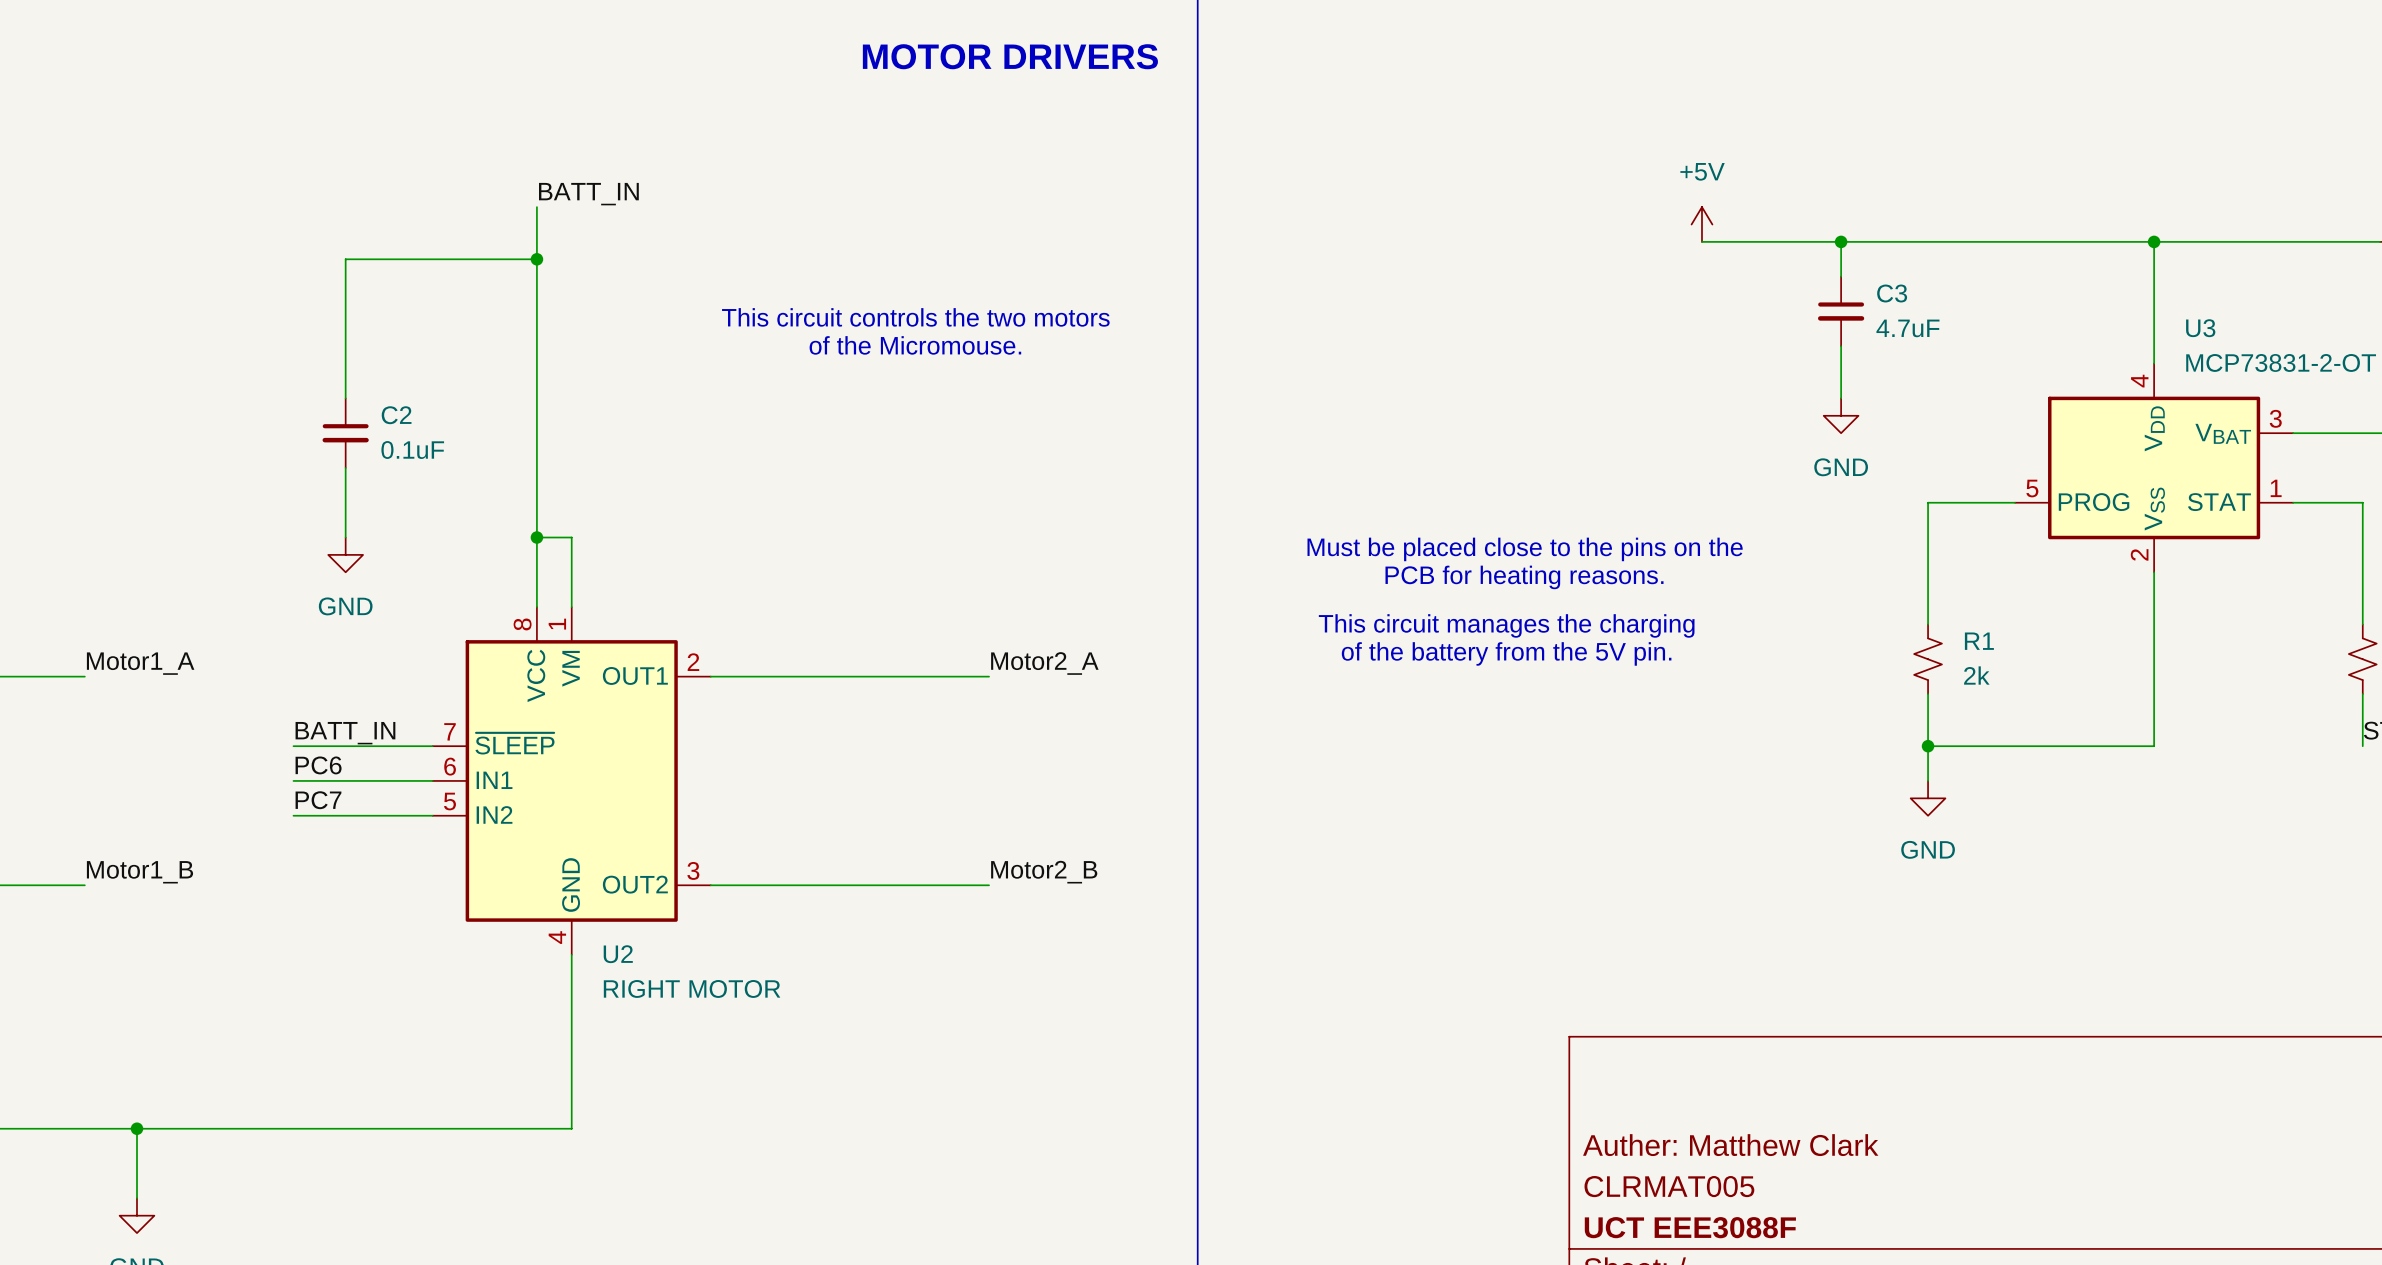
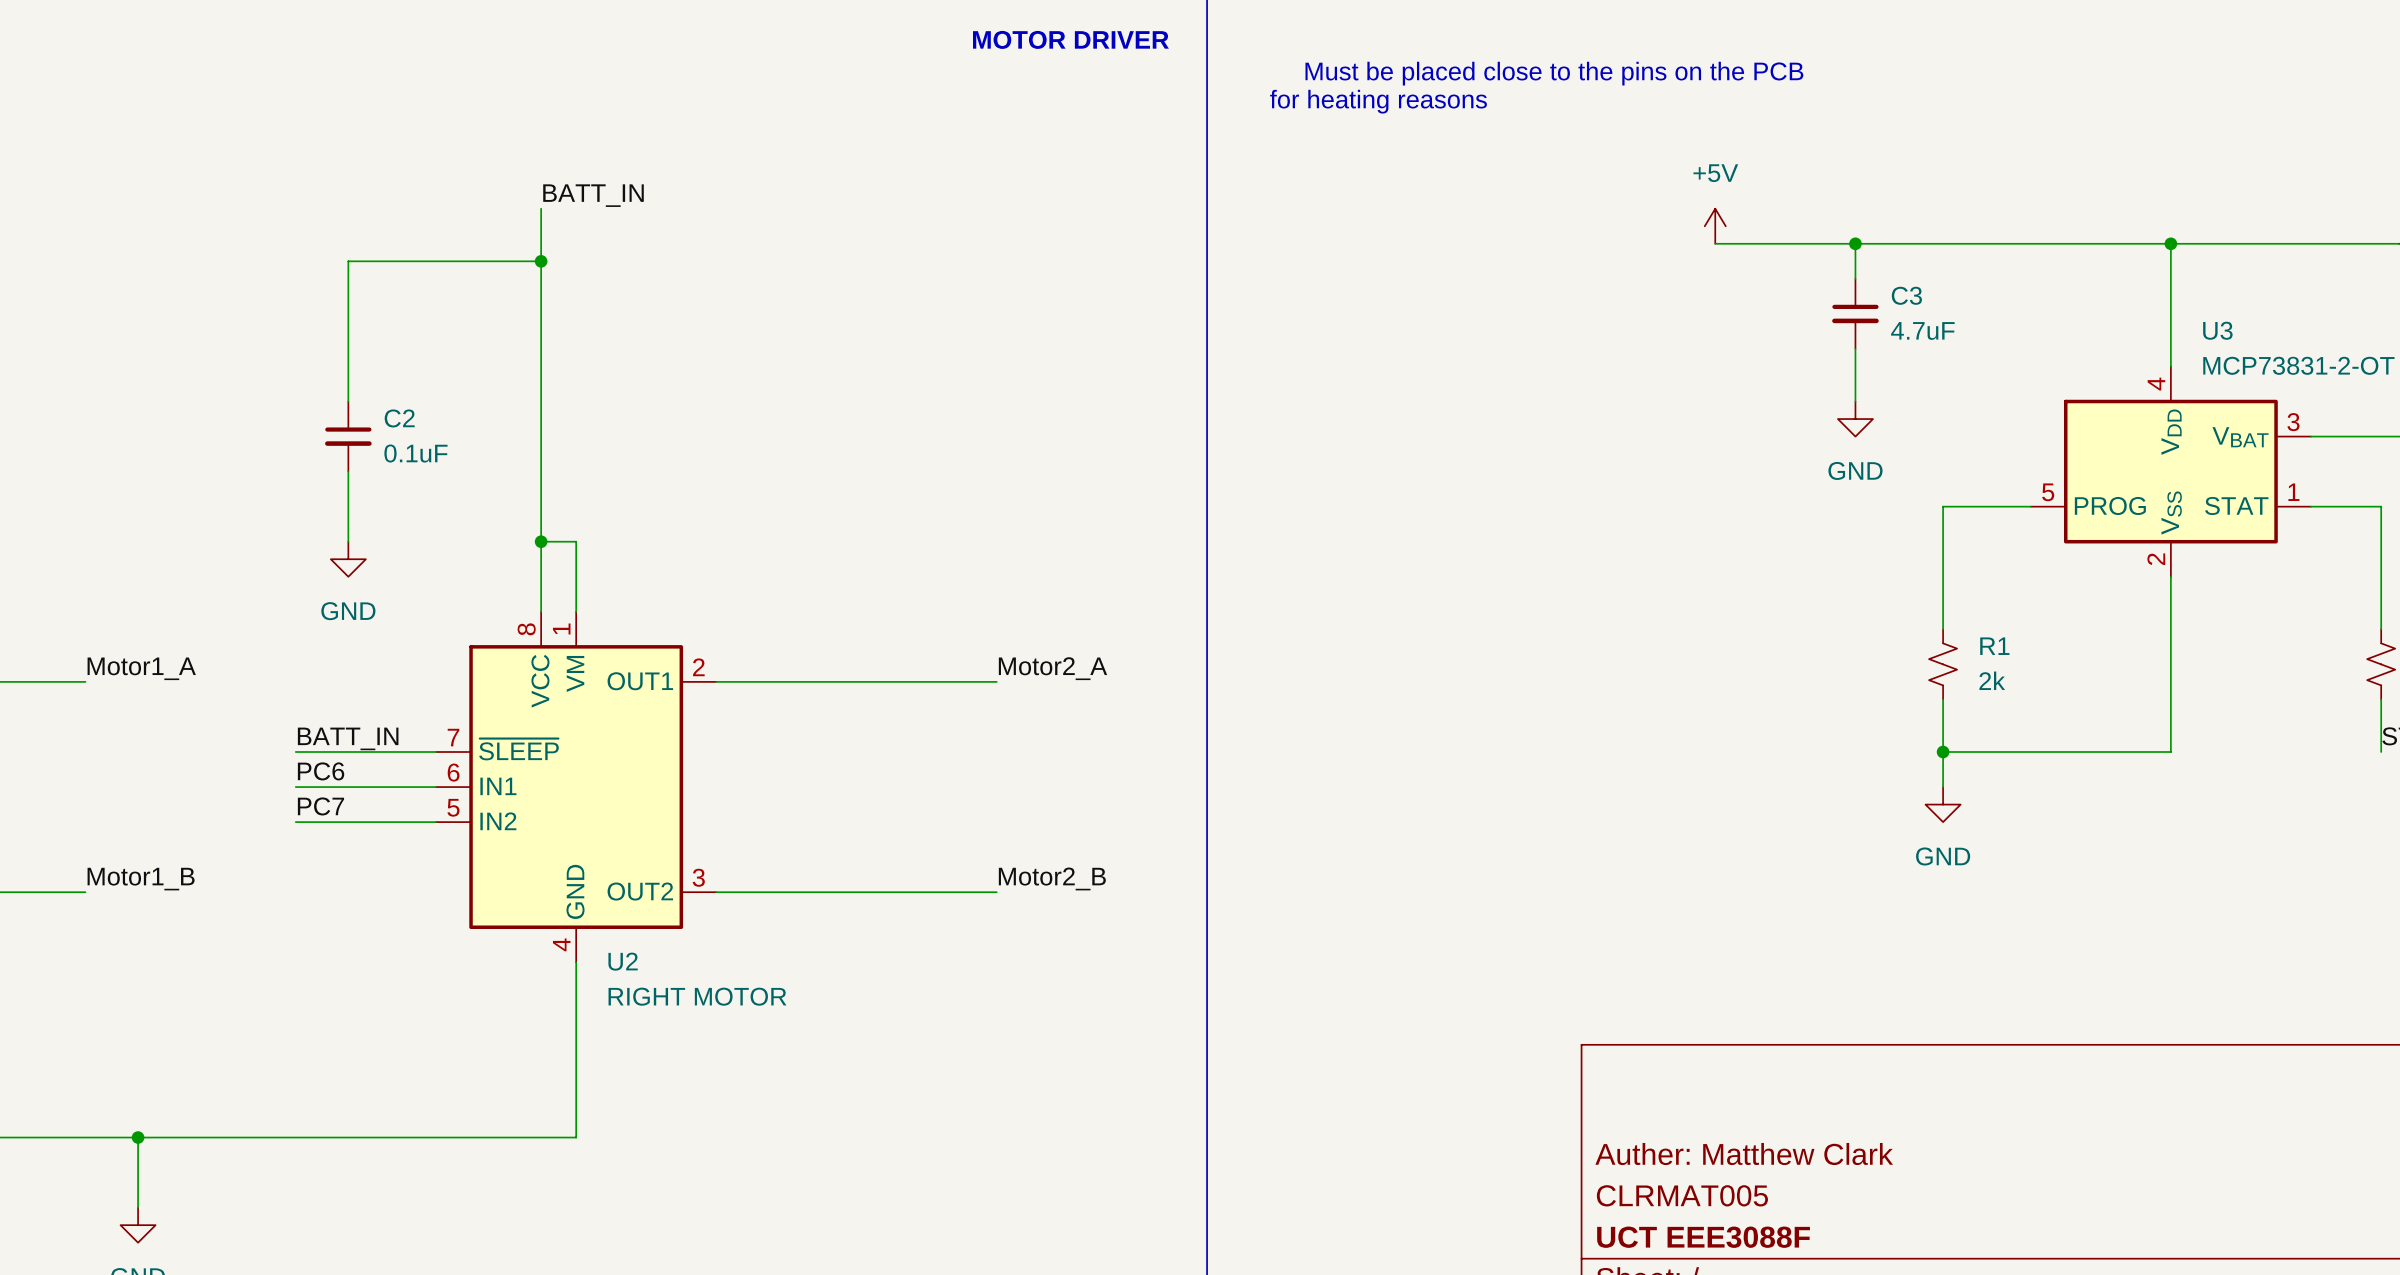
text: MOTOR DRIVERS (1010, 56) -> MOTOR DRIVER (1070, 39)
text: none -> Must be placed close to the pins on the PCB (1554, 73)
text: none -> for heating reasons (1378, 101)
text: This circuit controls the two motors (915, 317) -> none
text: of the Micromouse. (915, 345) -> none
text: Must be placed close to the pins on the (1525, 549) -> none
text: PCB for heating reasons. (1524, 577) -> none
text: This circuit manages the charging (1506, 625) -> none
text: of the battery from the 5V pin. (1506, 653) -> none

